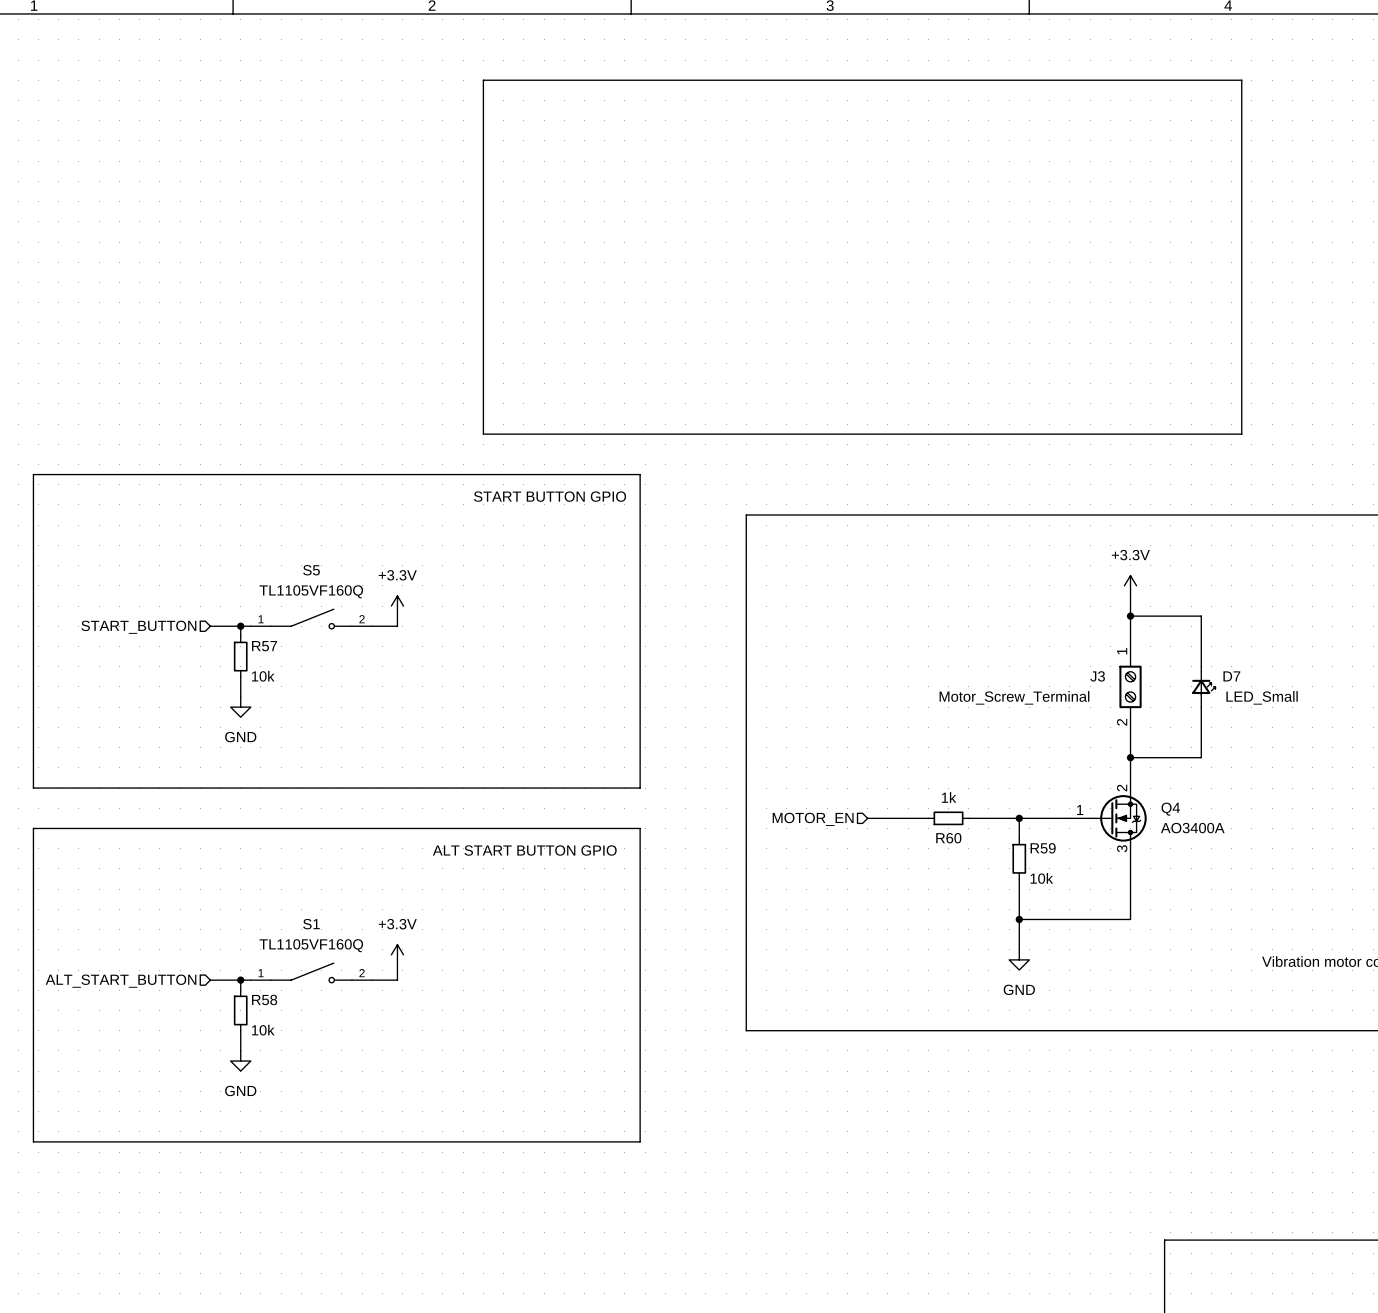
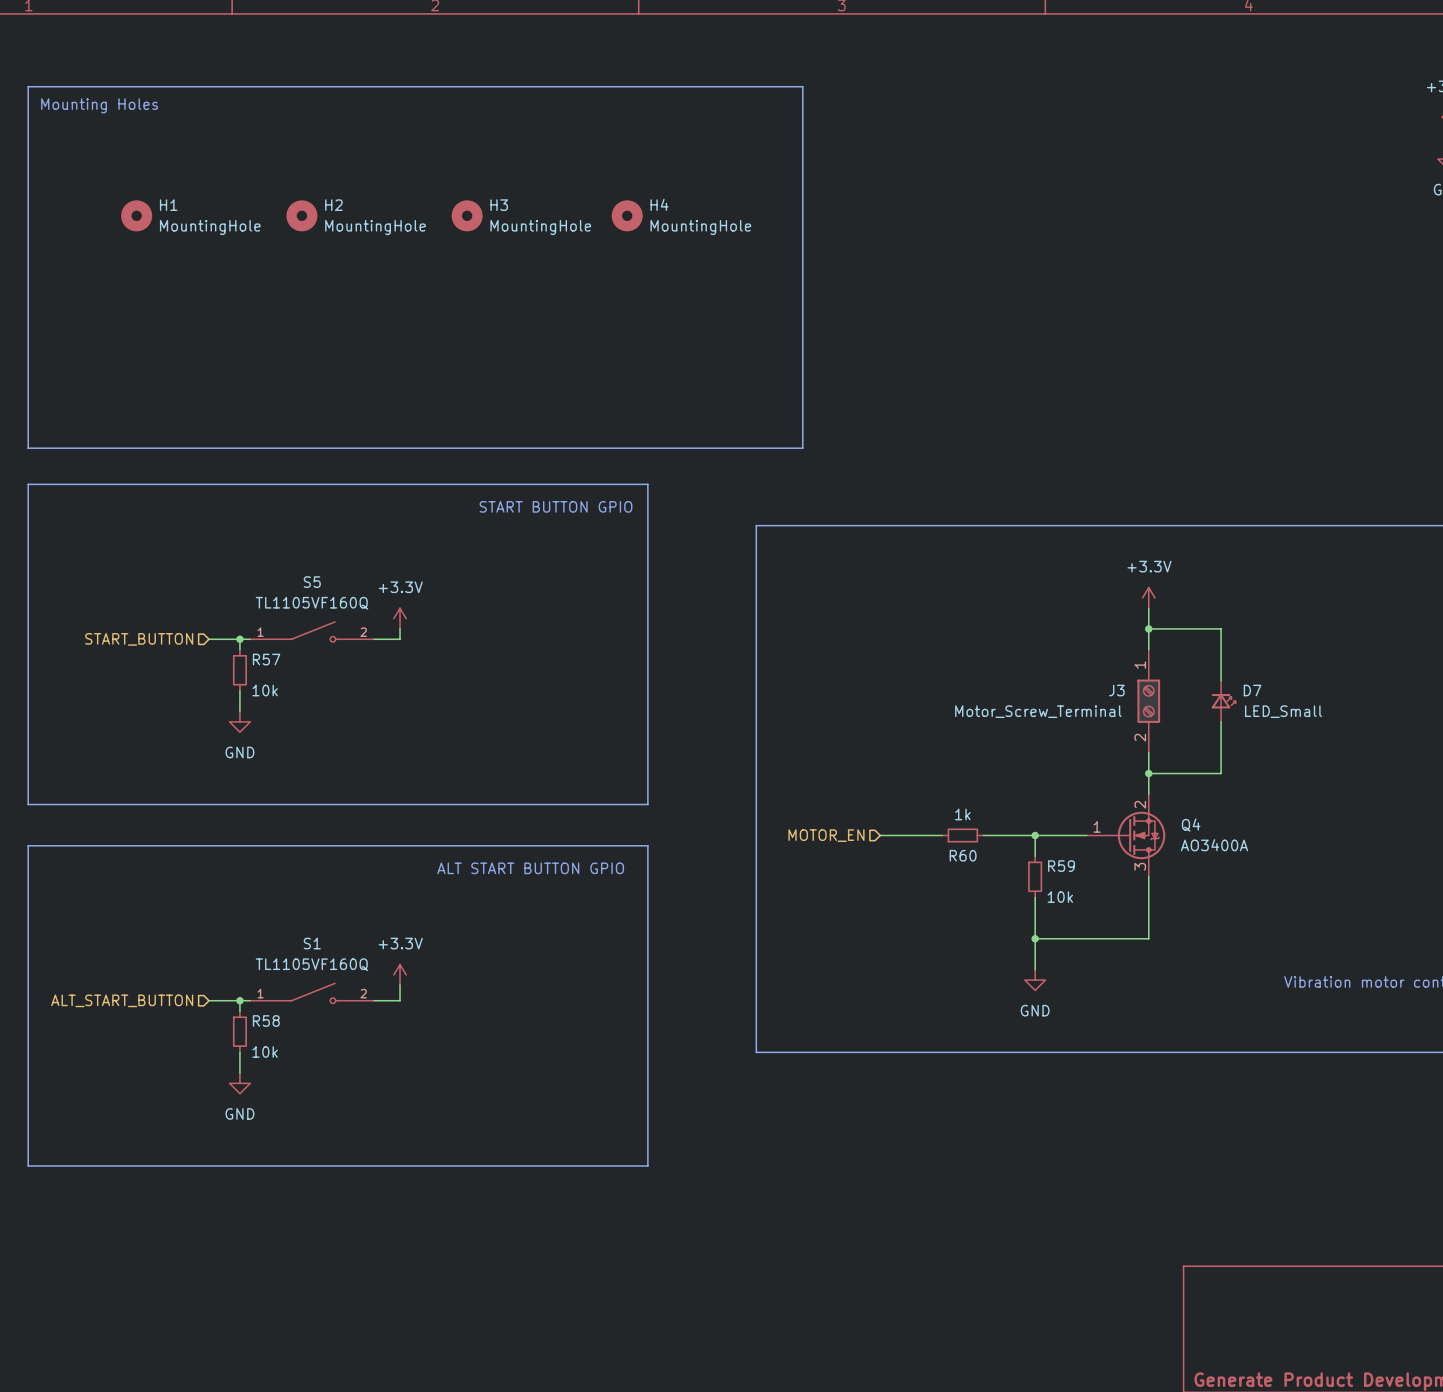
line: (483, 80) (1241, 80) (1241, 434) (483, 434) (483, 80) -> none
line: none -> (28, 86) (802, 86) (802, 448) (28, 448) (28, 86)
text: none -> Mounting Holes (99, 105)
H1: none -> MountingHole (136, 215)
H2: none -> MountingHole (301, 215)
H3: none -> MountingHole (467, 215)
H4: none -> MountingHole (627, 215)

